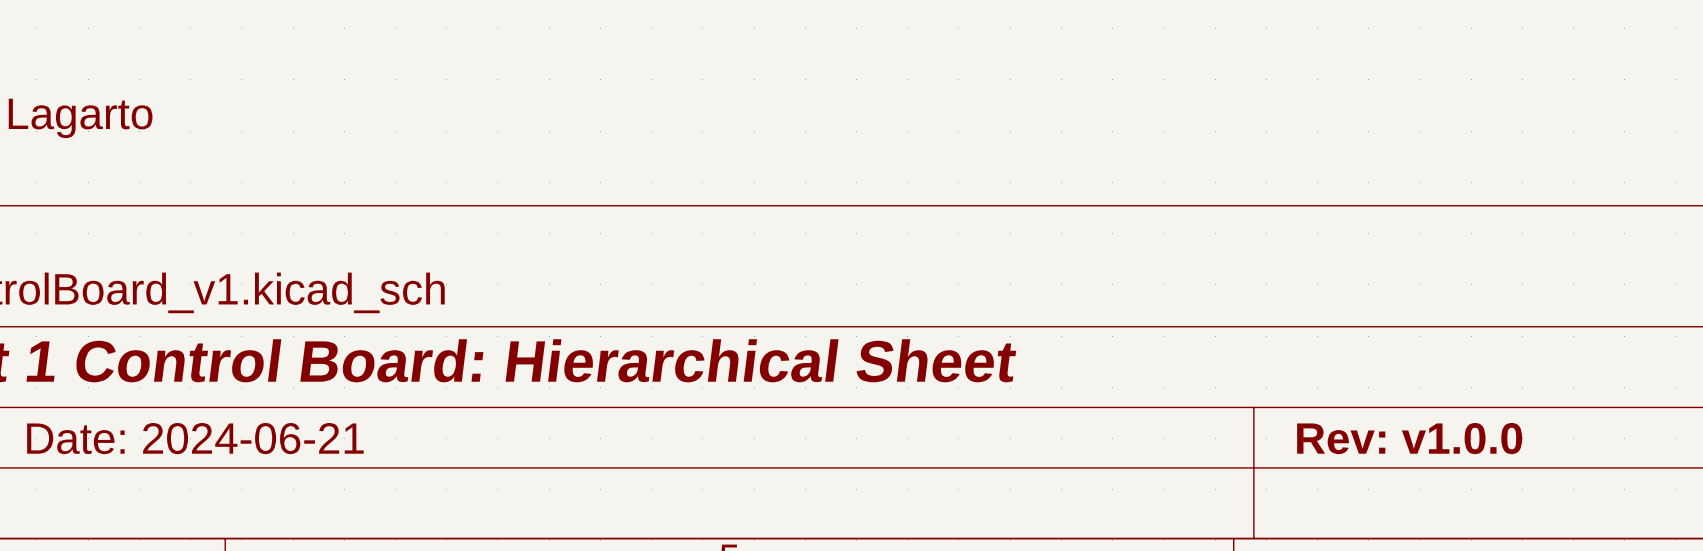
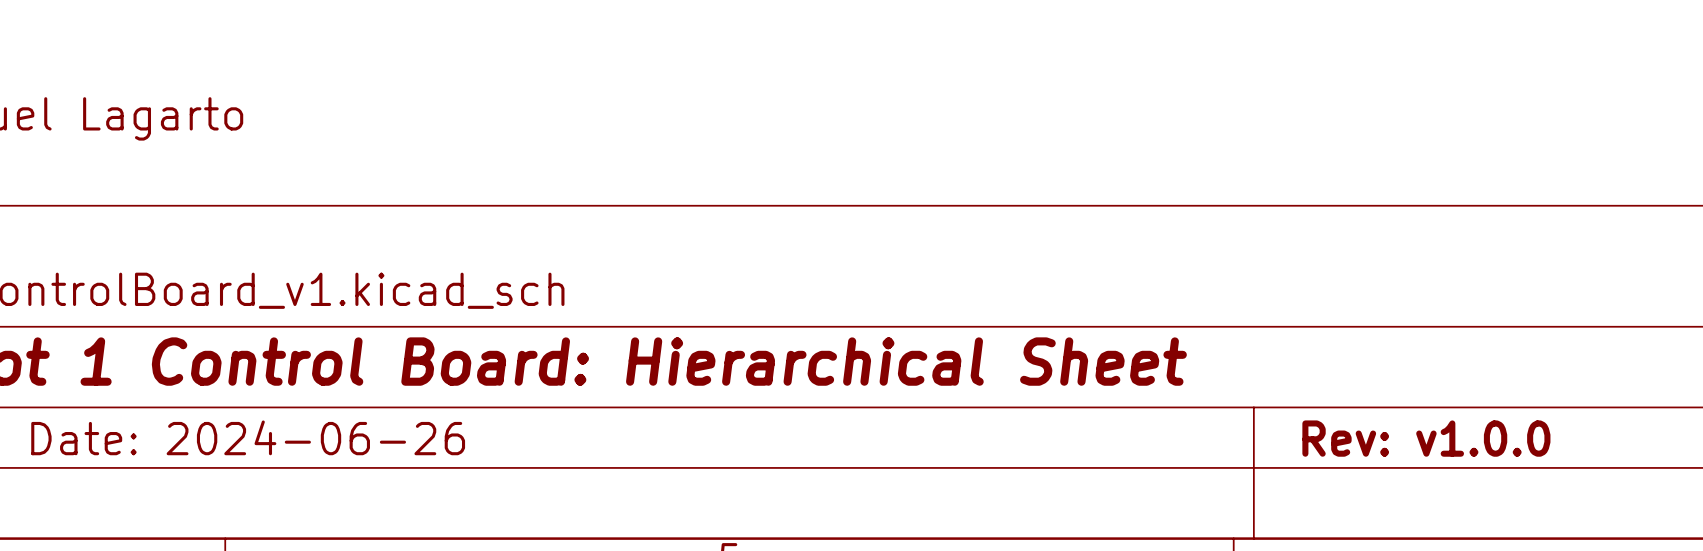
title block: Date: 2024-06-21 (195, 438) -> Date: 2024-06-26 (248, 437)

